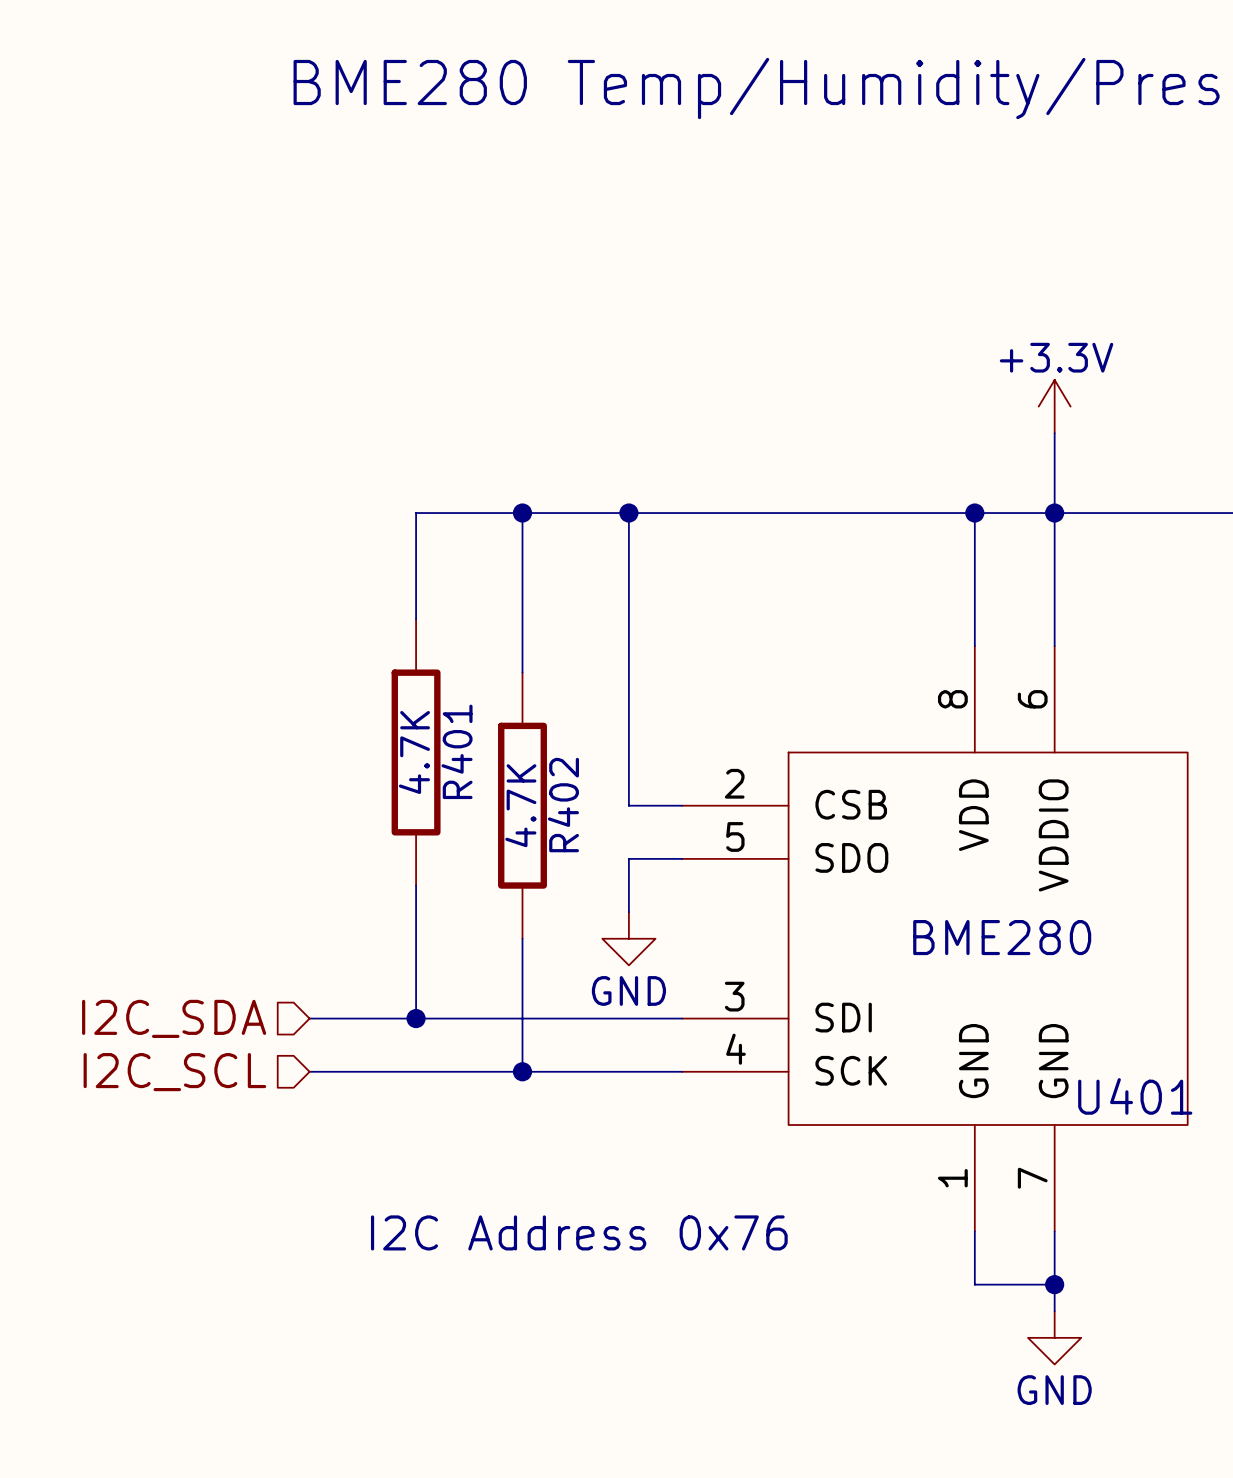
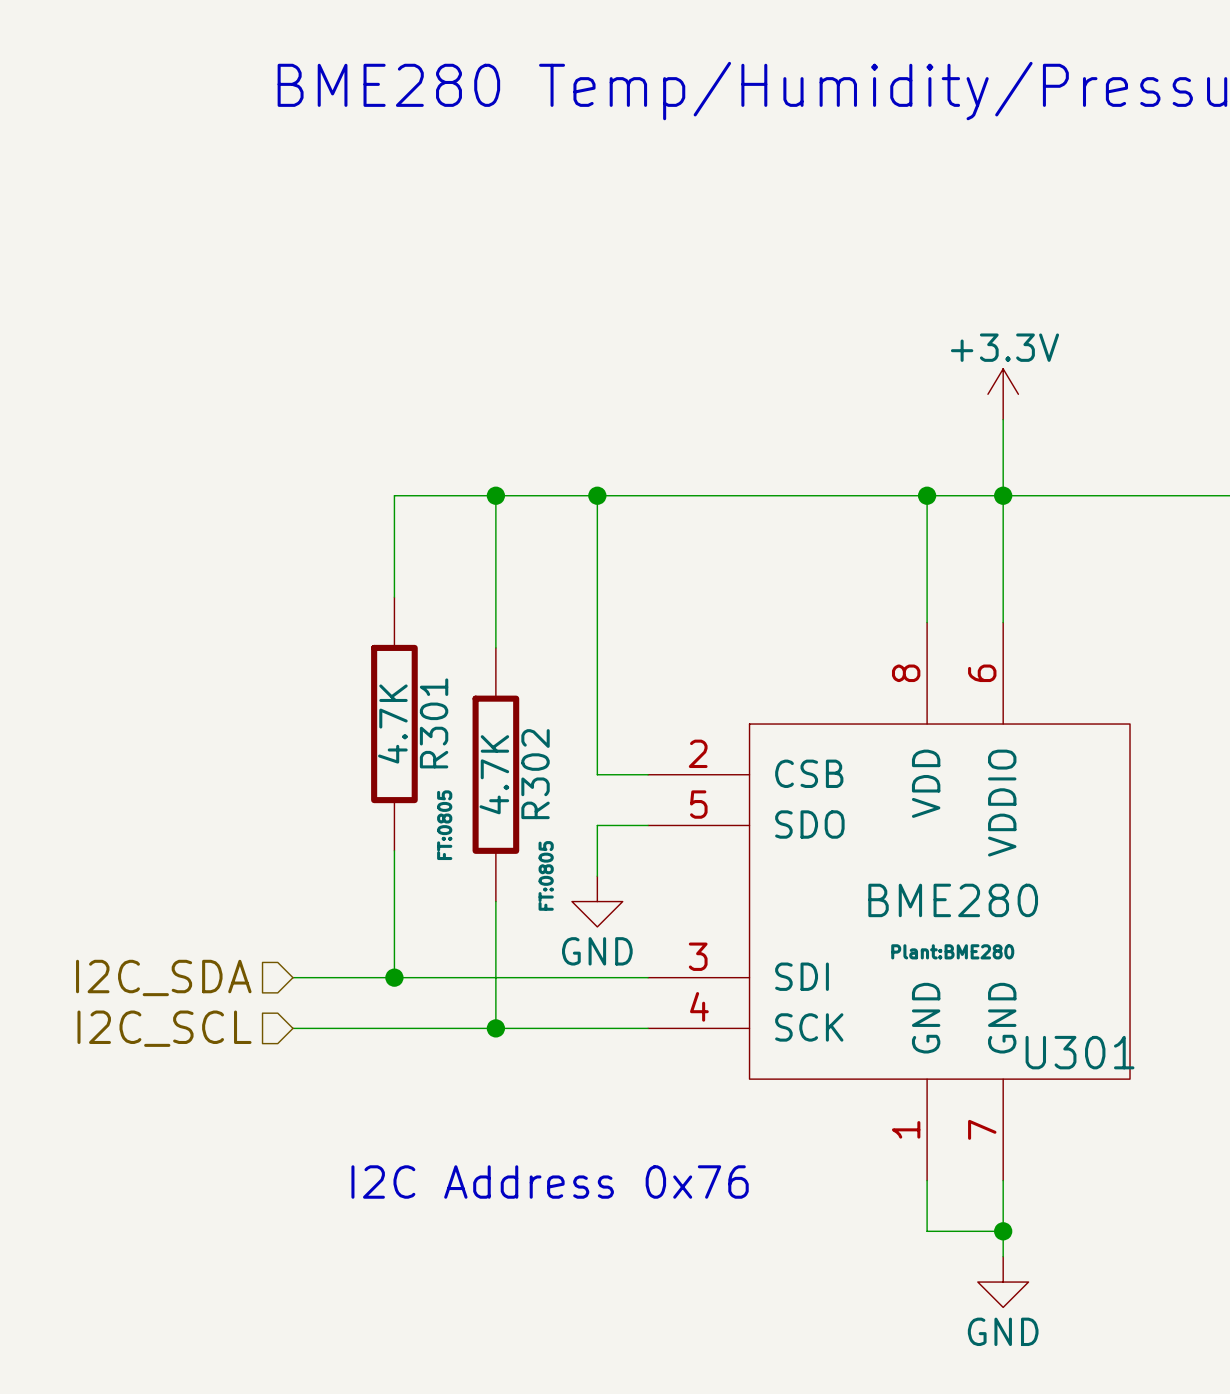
R401 name: R401 (457, 751) -> R301 (434, 723)
R402 name: R402 (563, 805) -> R302 (535, 774)
R401 text: none -> FT:0805 (444, 825)
R402 text: none -> FT:0805 (546, 875)
U401 text: none -> Plant:BME280 (952, 951)
U401 name: U401 (1135, 1096) -> U301 (1080, 1052)

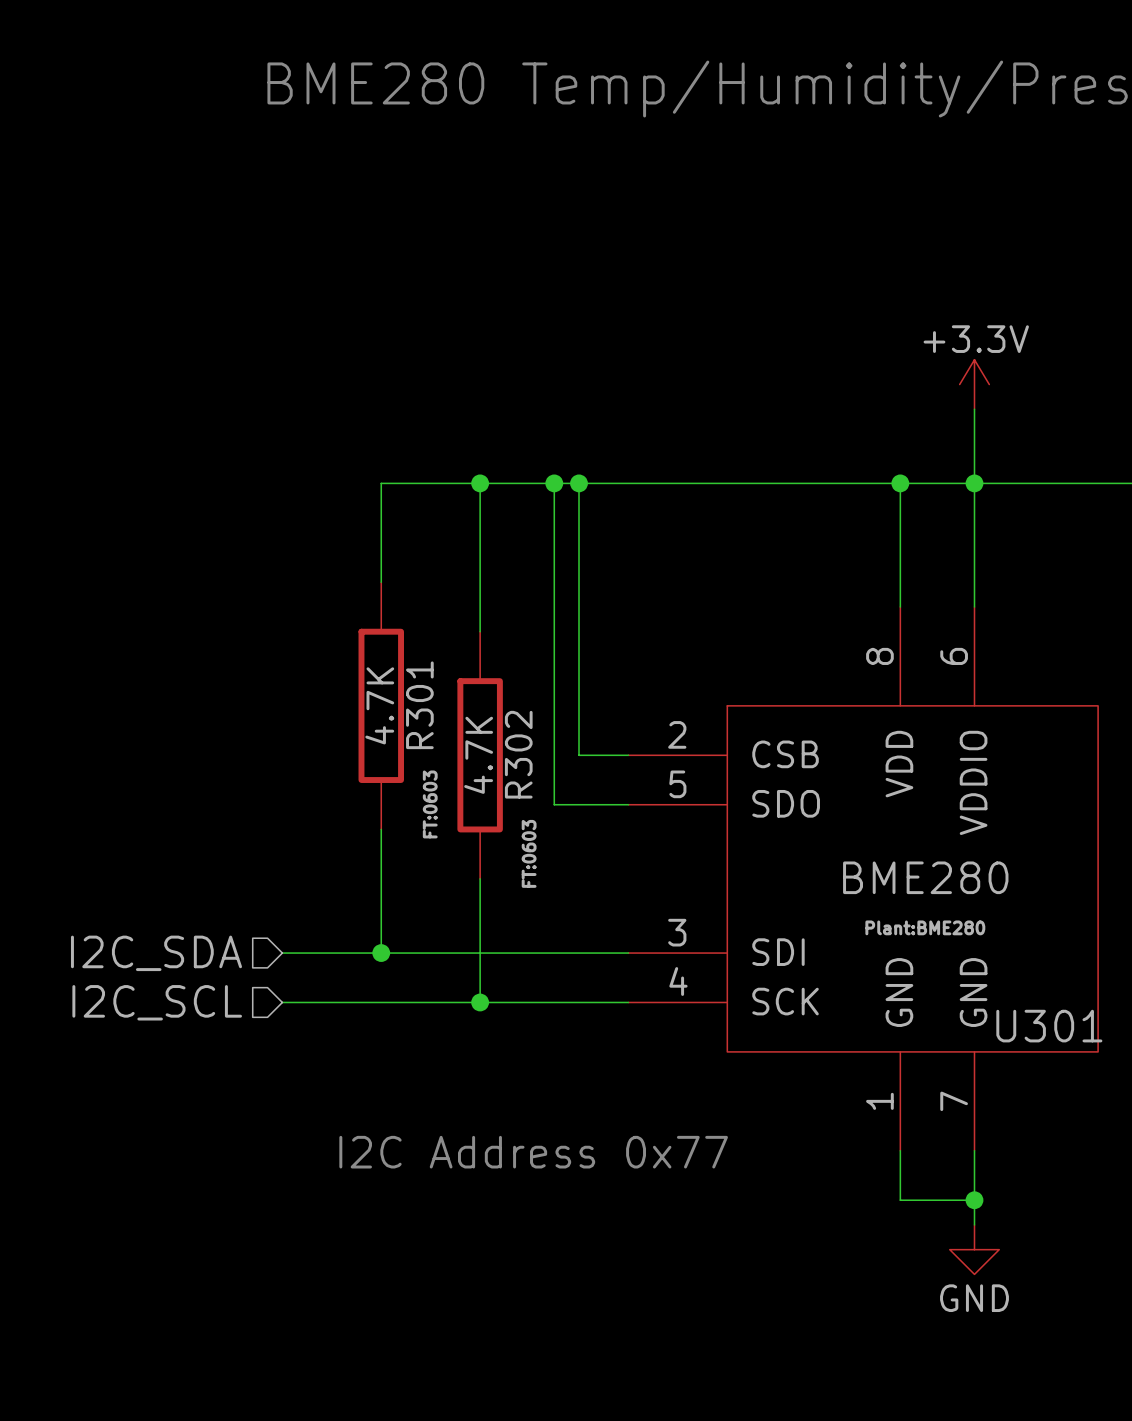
junction: none -> (554, 483)
R301 text: FT:0805 (444, 825) -> FT:0603 (430, 804)
wire: (597, 825) (597, 876) -> (579, 804) (554, 804) (554, 483)
R302 text: FT:0805 (546, 875) -> FT:0603 (529, 853)
power symbol: GND (597, 901) -> none
text: I2C Address 0x76 (550, 1182) -> I2C Address 0x77 (533, 1152)

